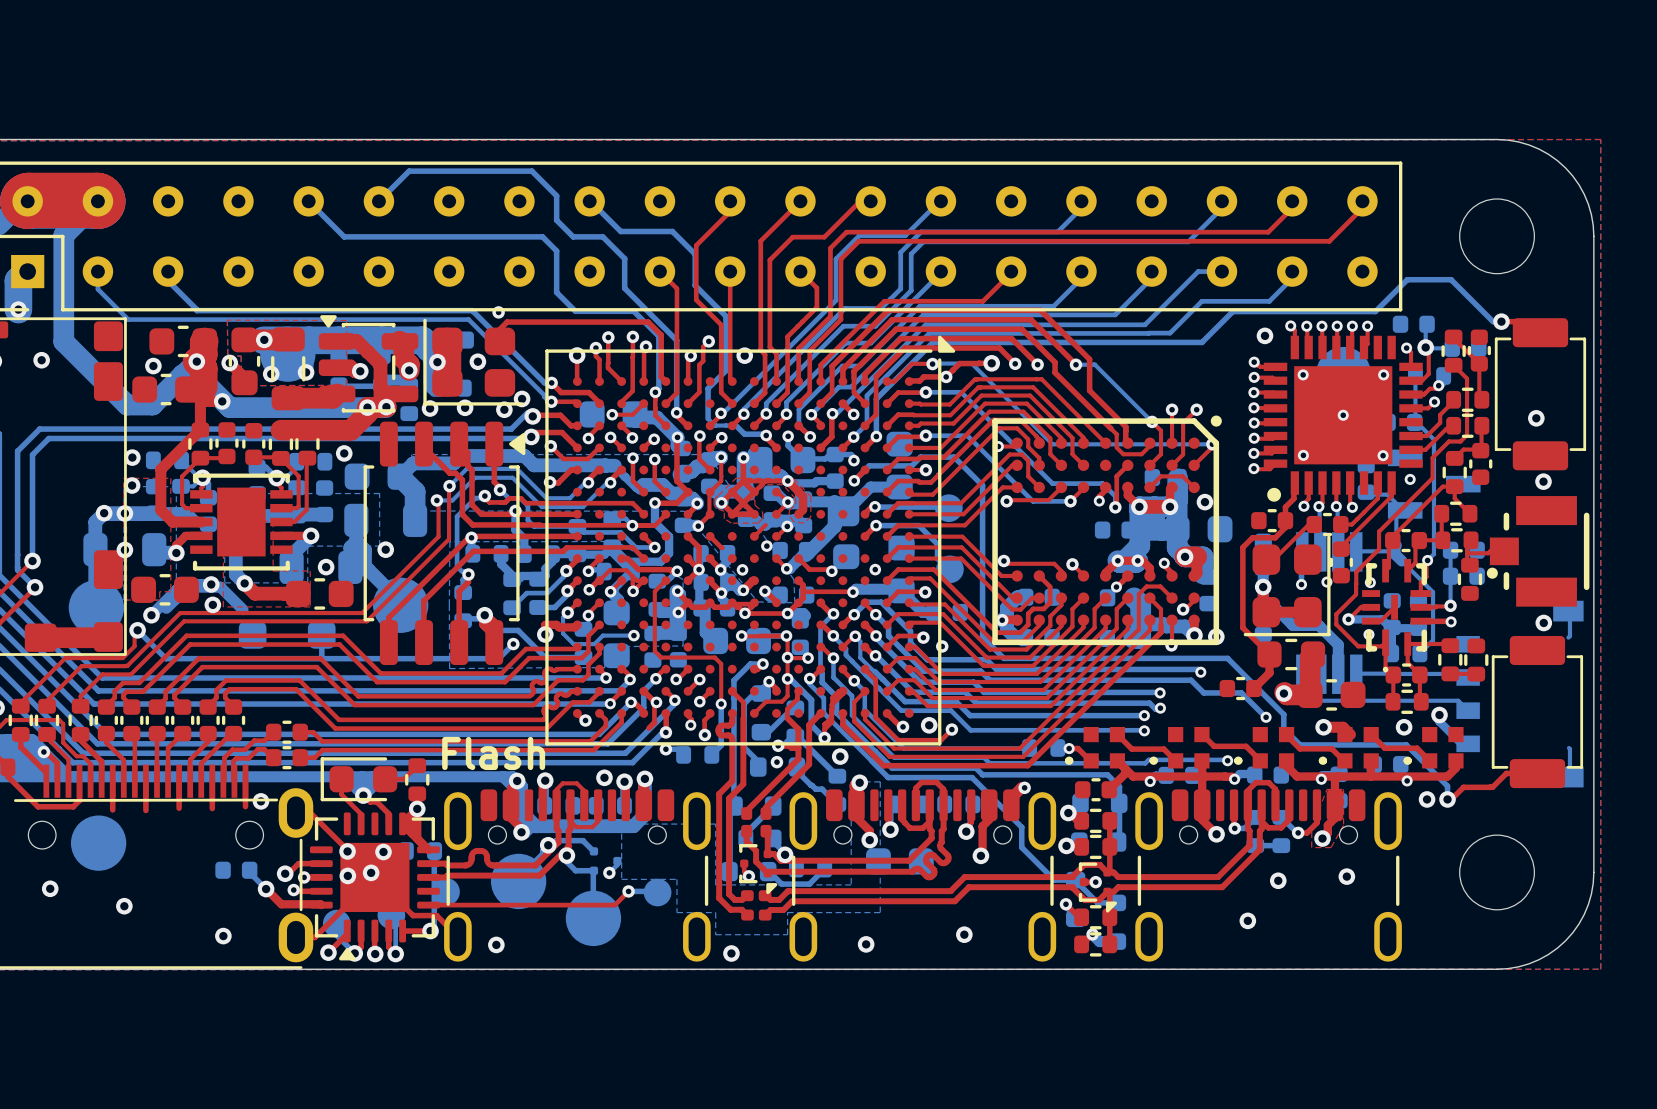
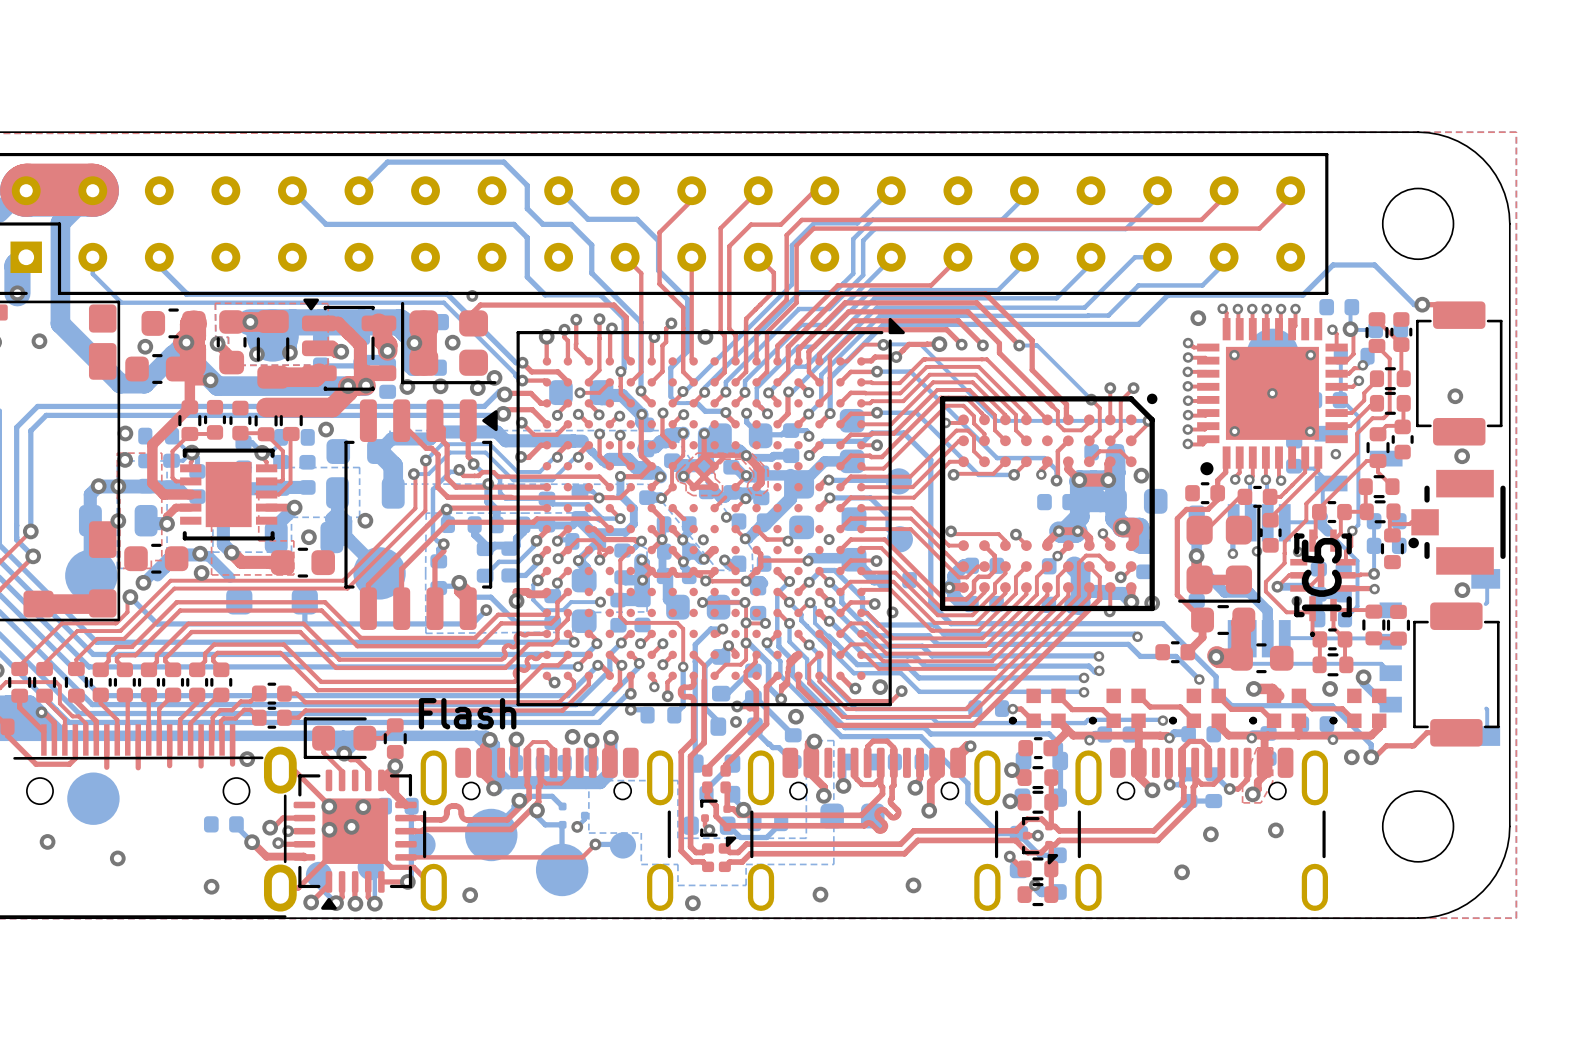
IC5 name: none -> IC5 (1321, 574)

